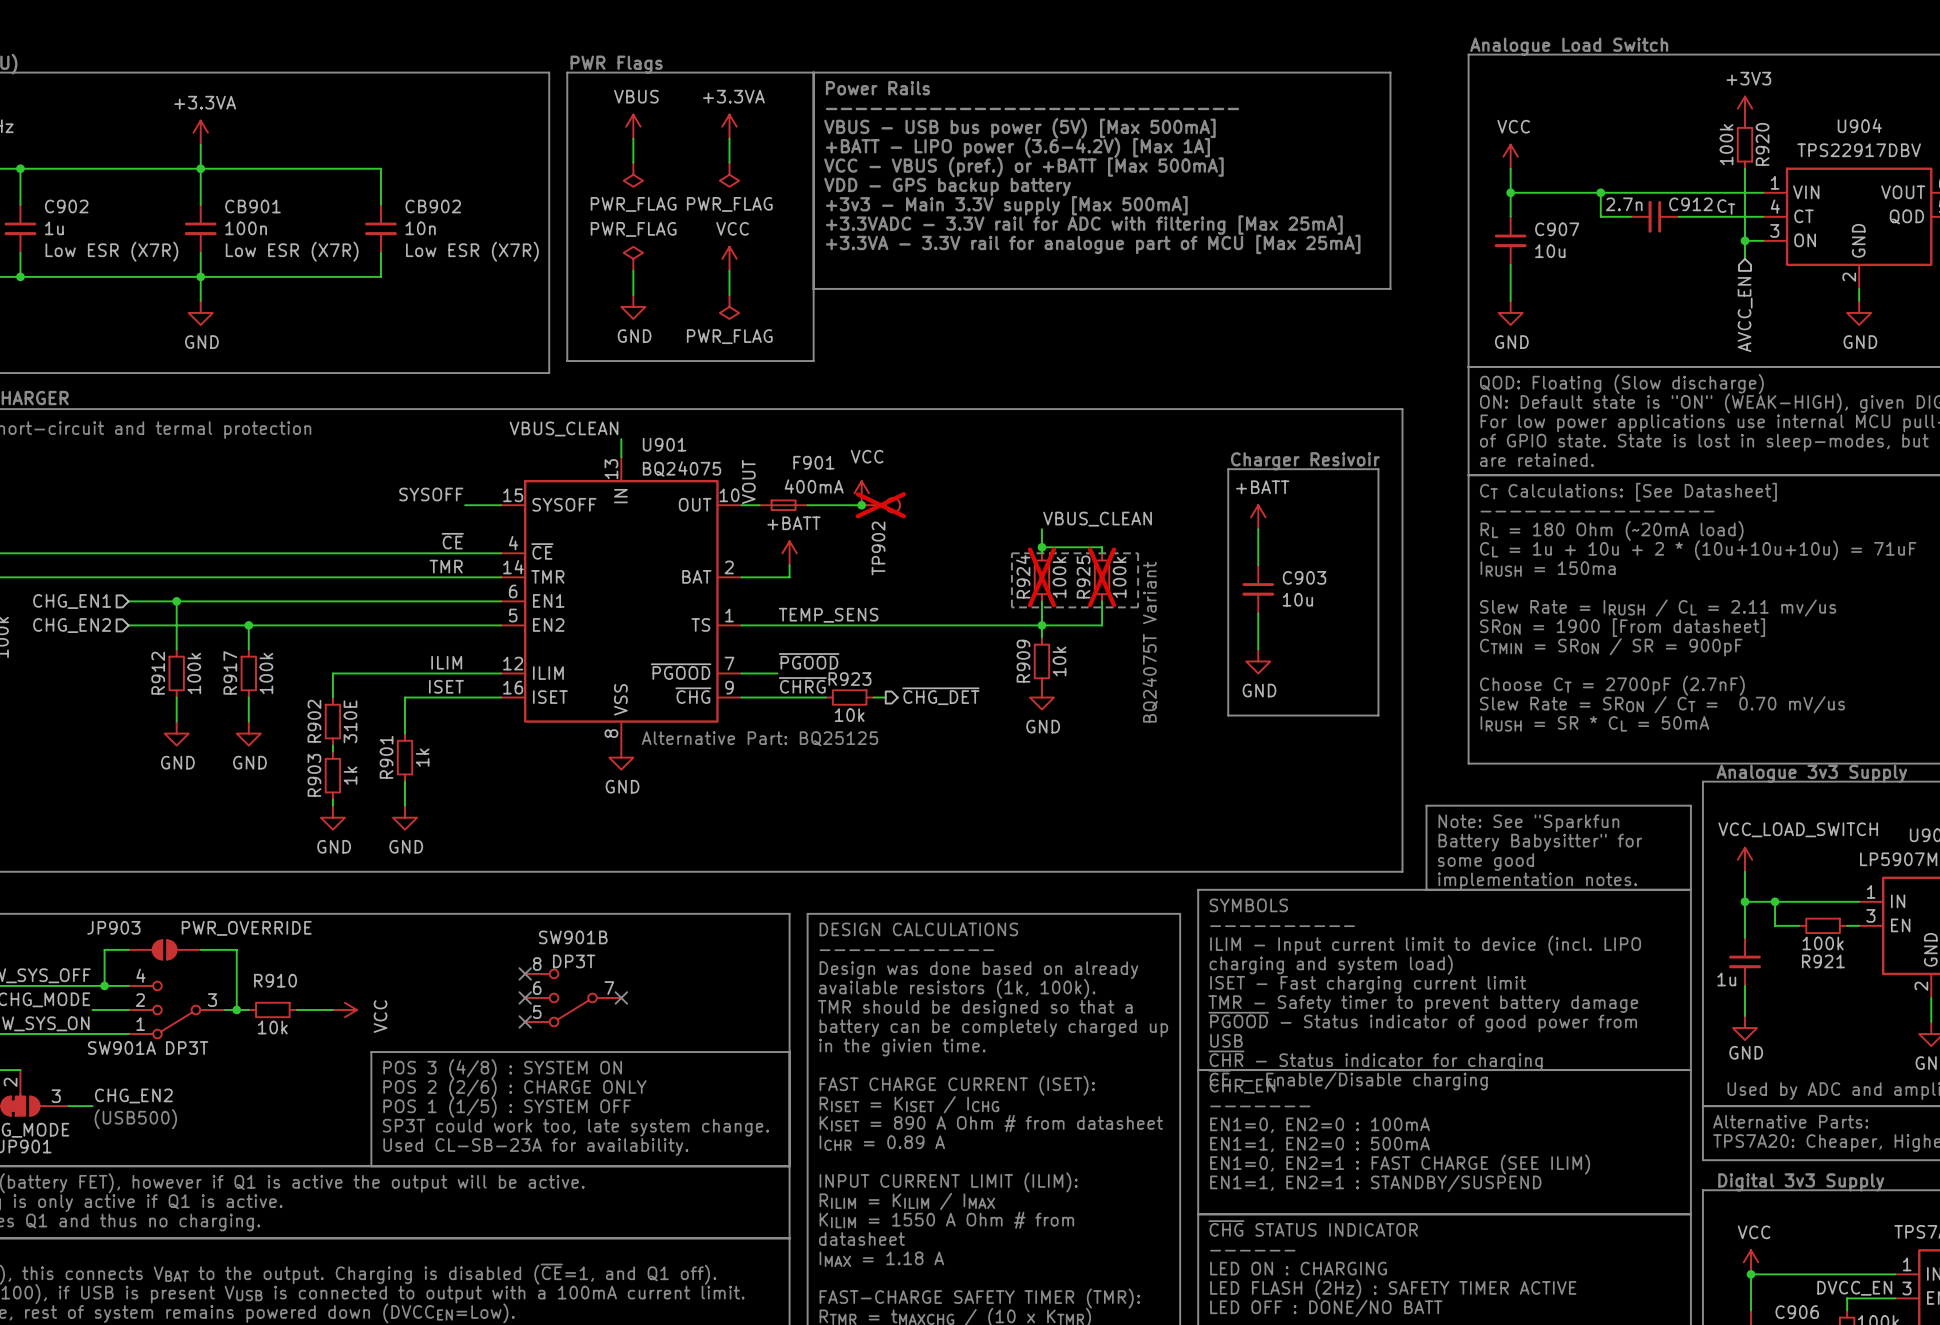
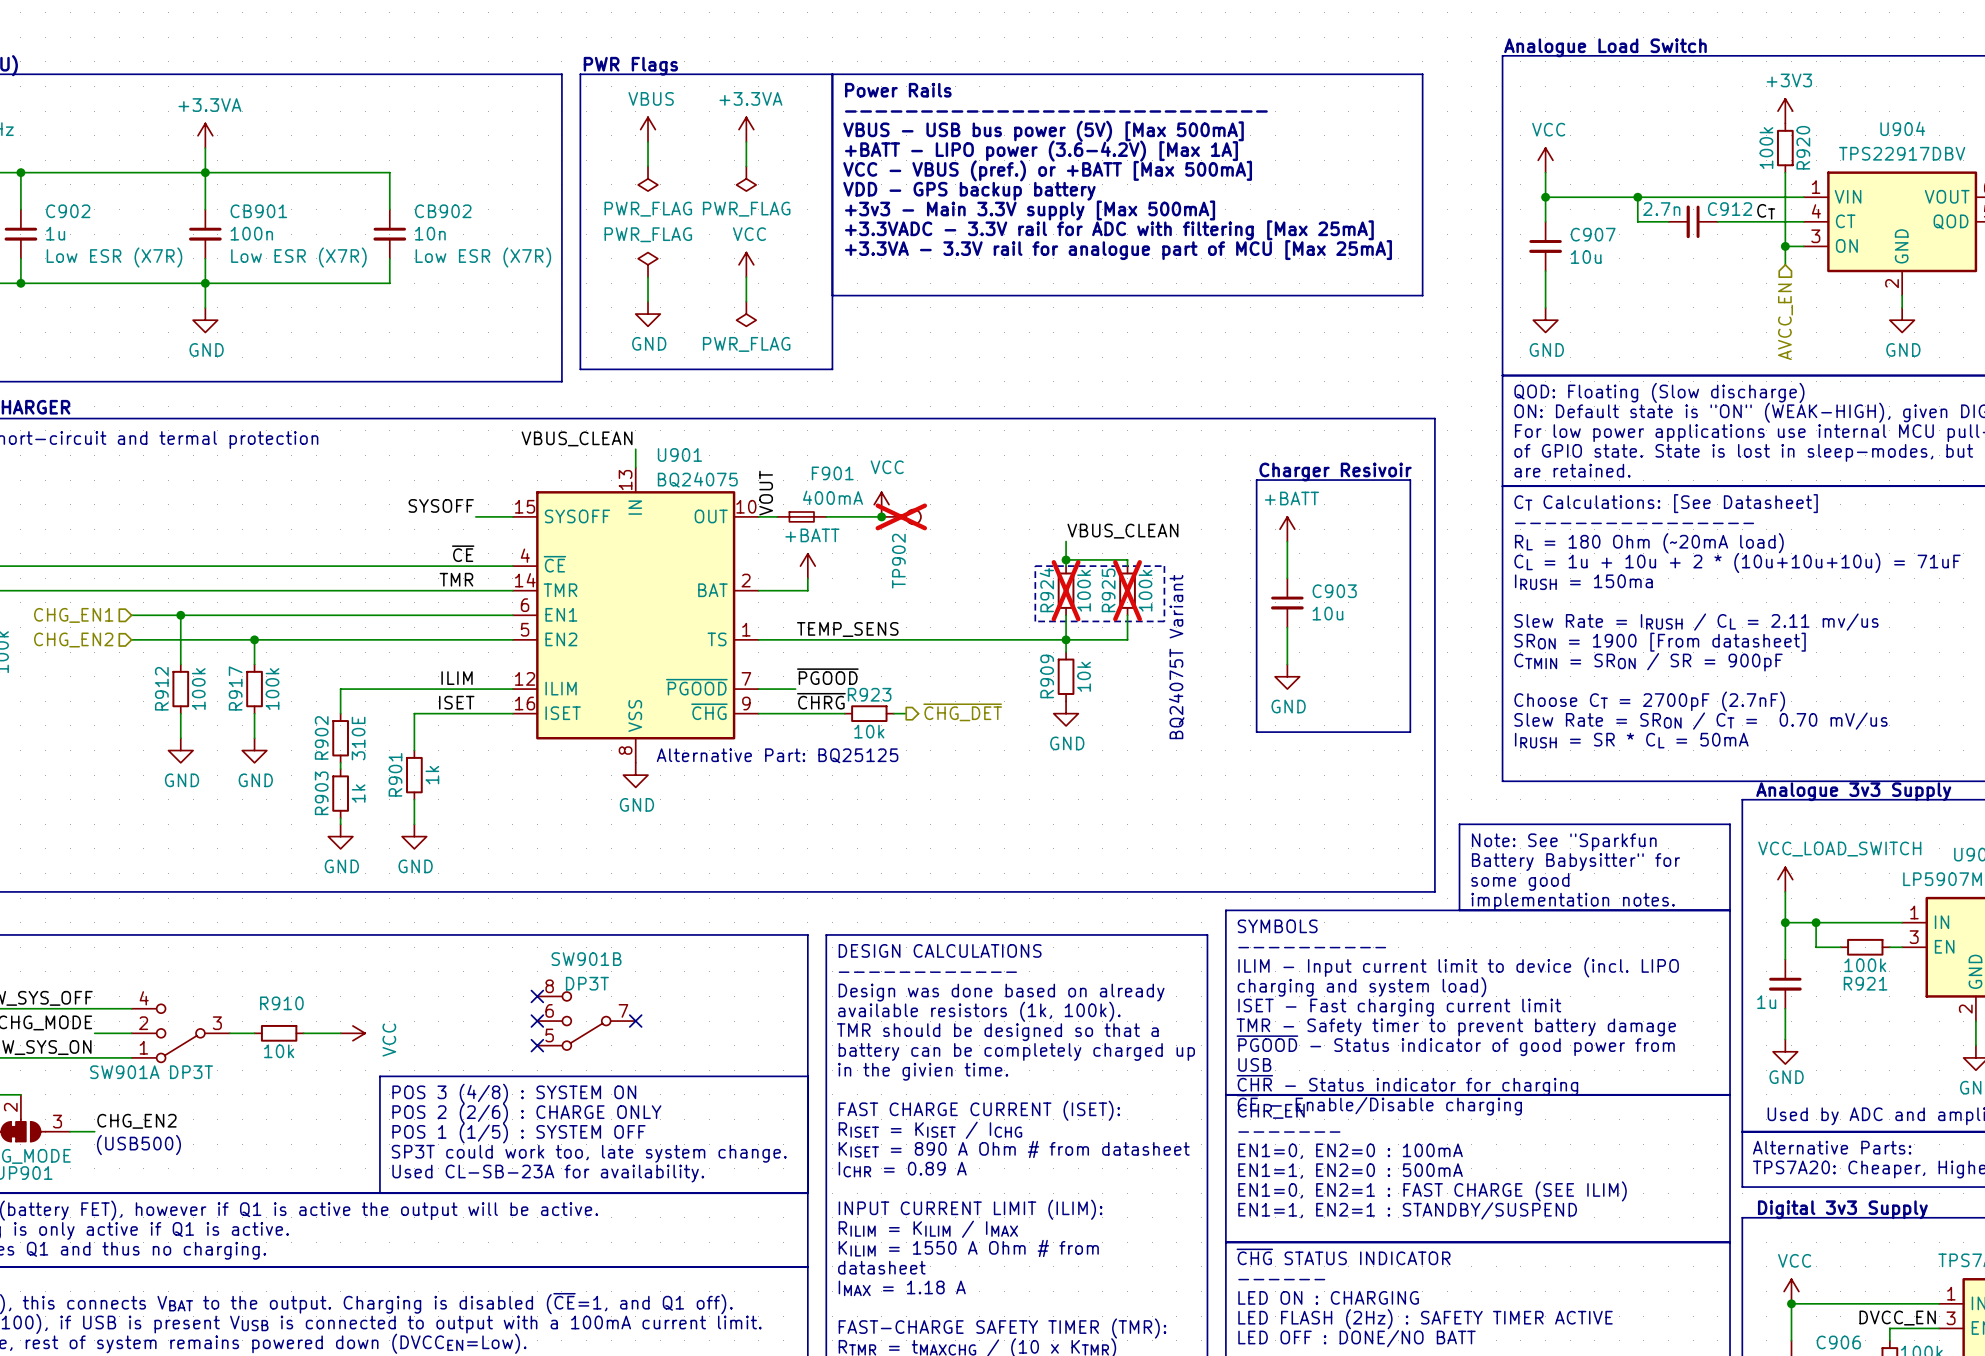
wire: (128, 949) (104, 949) (104, 985) -> none
JP903: PWR_OVERRIDE (164, 949) -> none
wire: (200, 949) (236, 949) (236, 1009) -> none
junction: (104, 985) -> none
junction: (236, 1009) -> none

